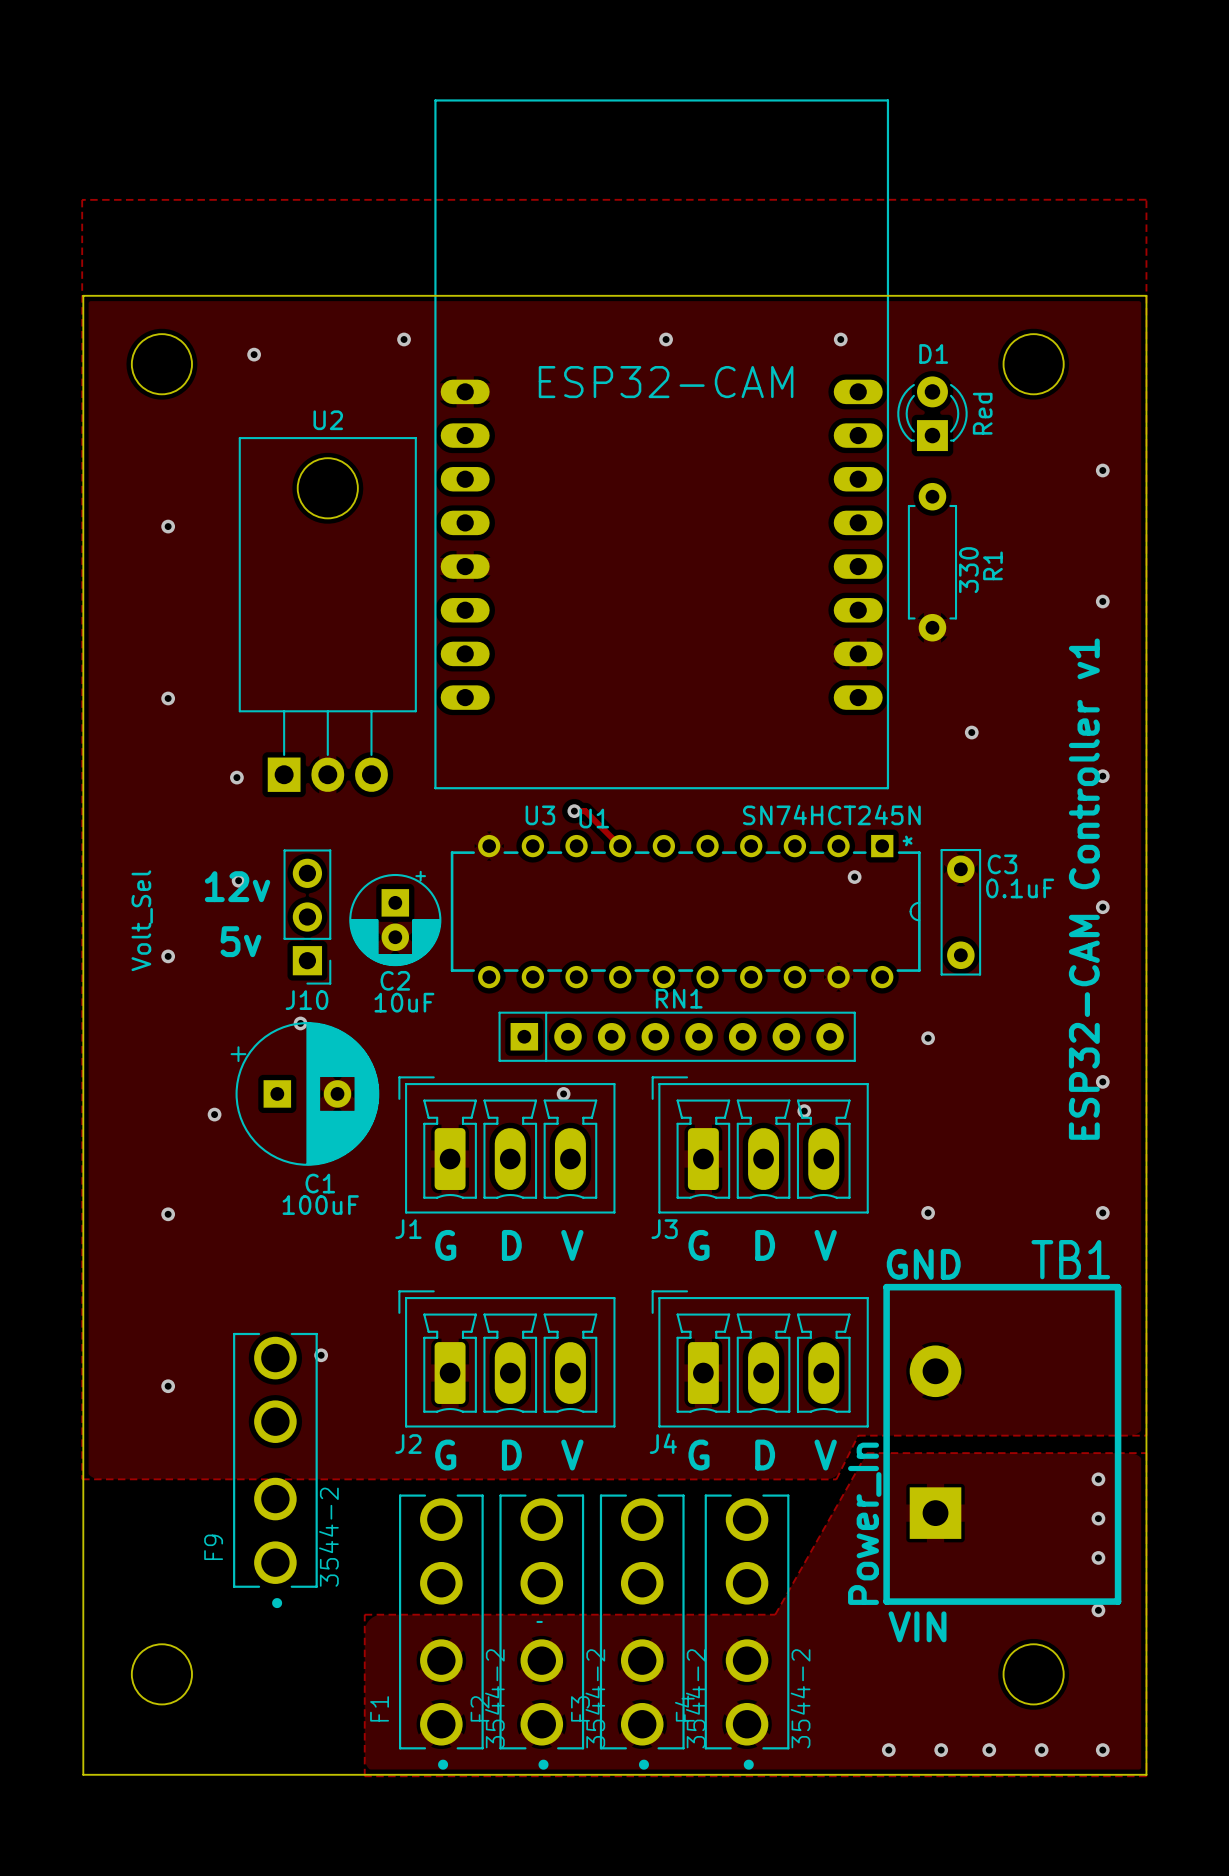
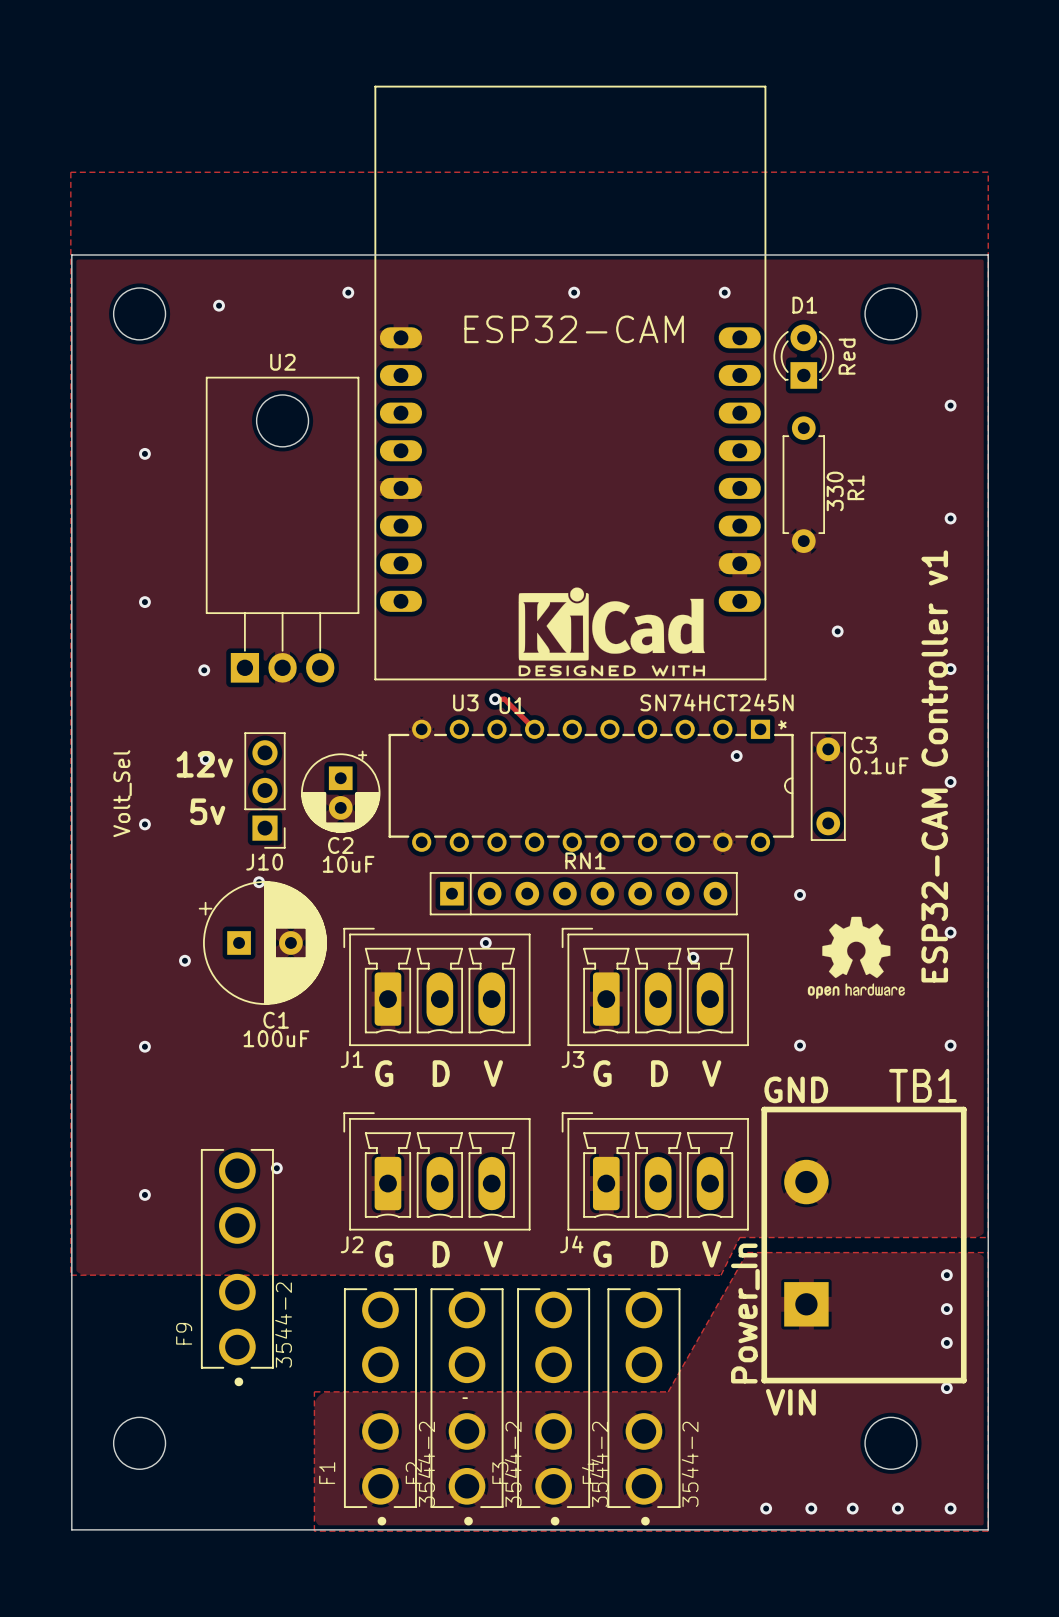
drawing: none -> [518, 587, 706, 677]
drawing: none -> [807, 916, 905, 999]

